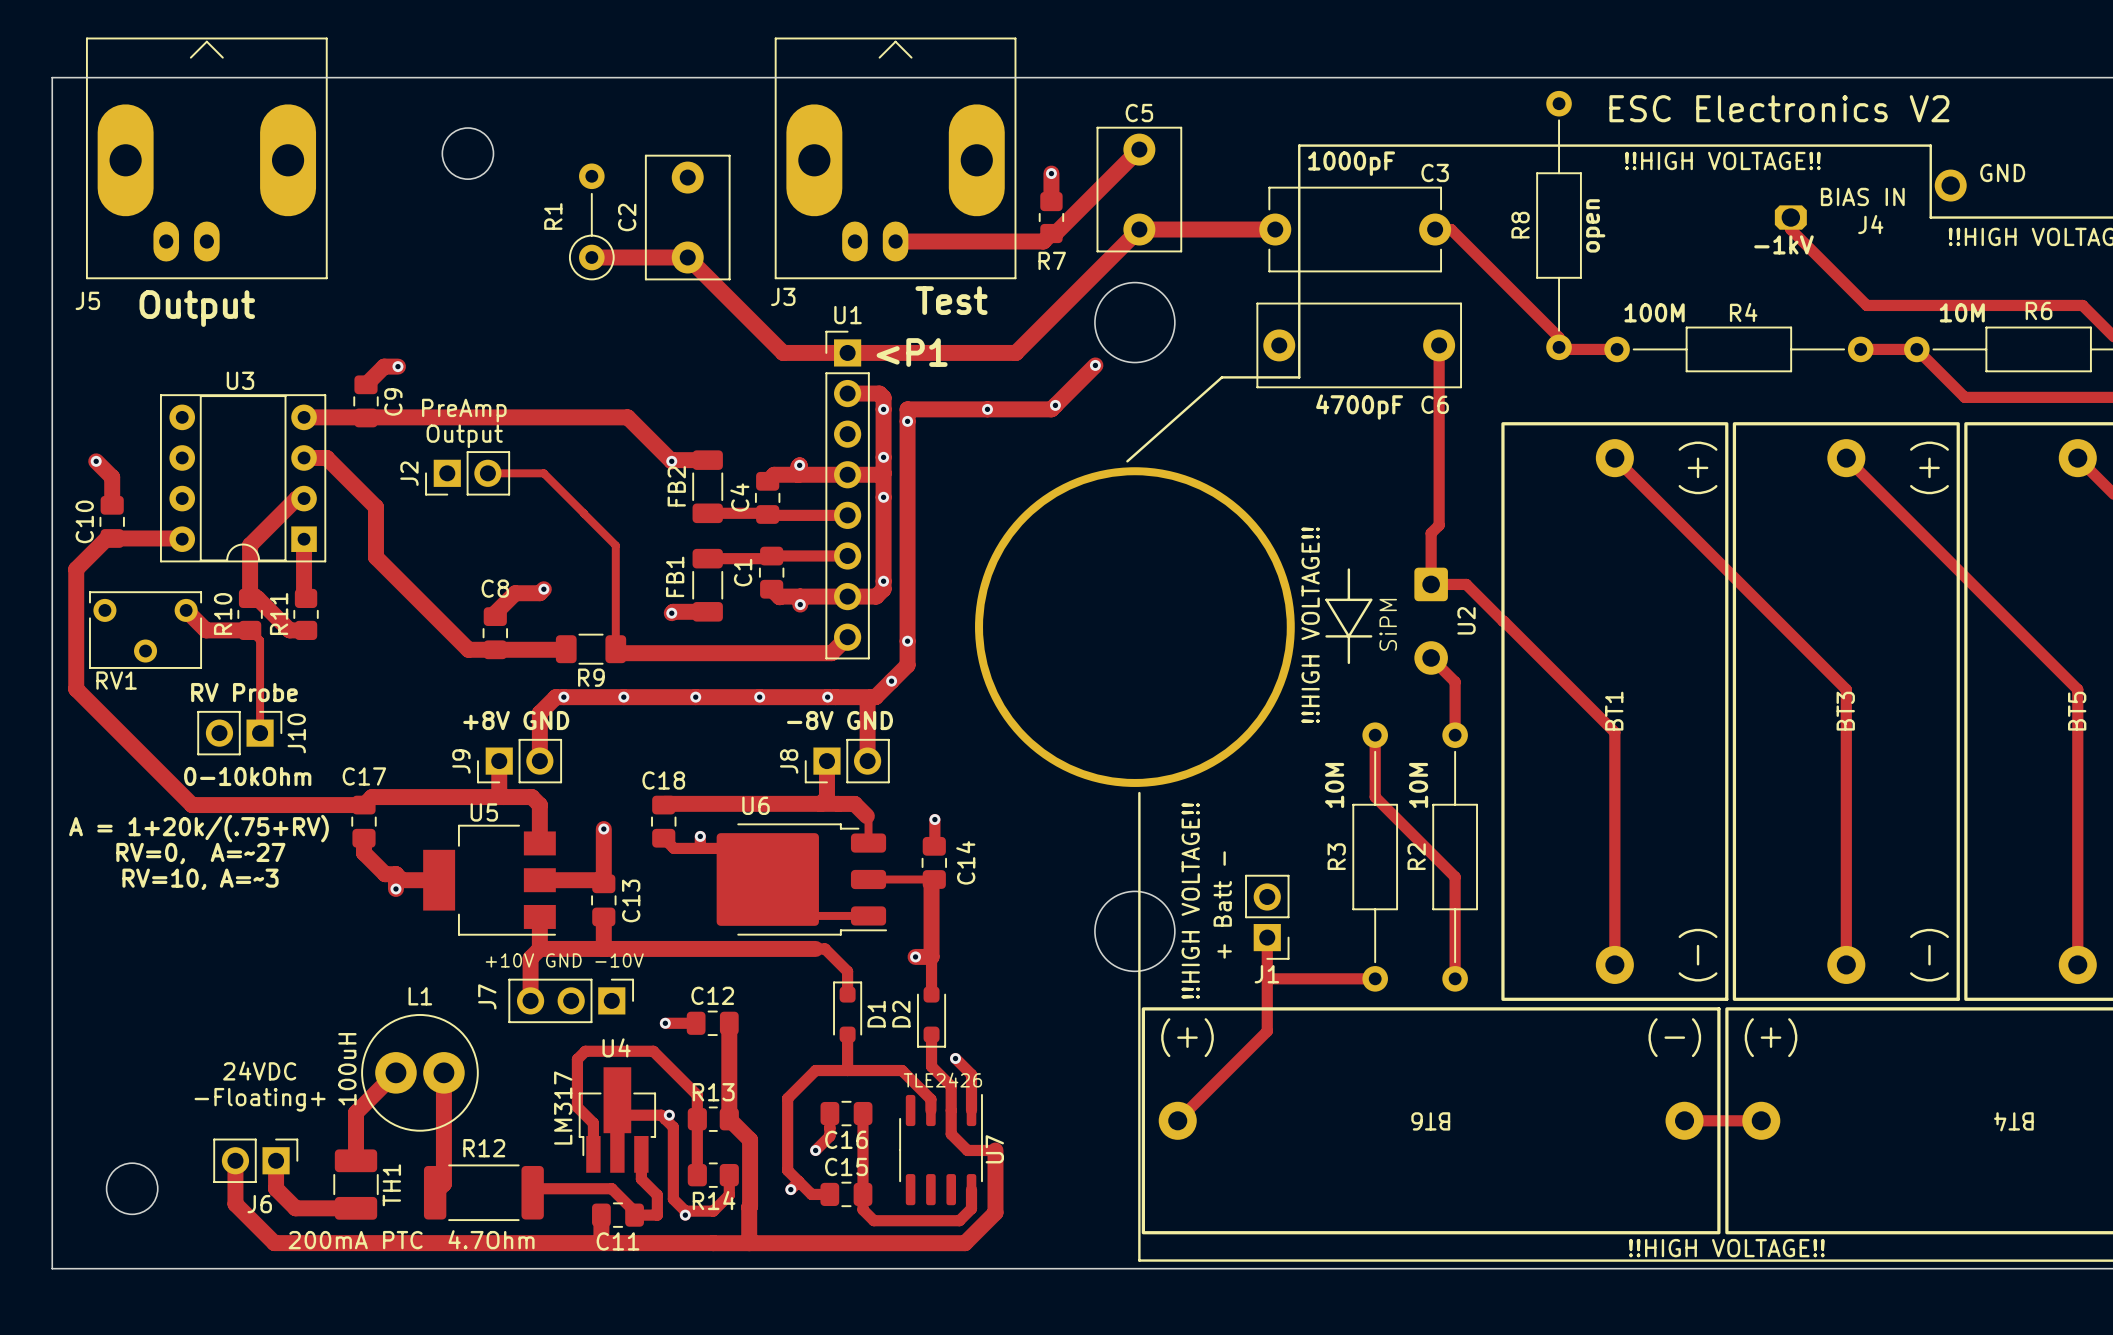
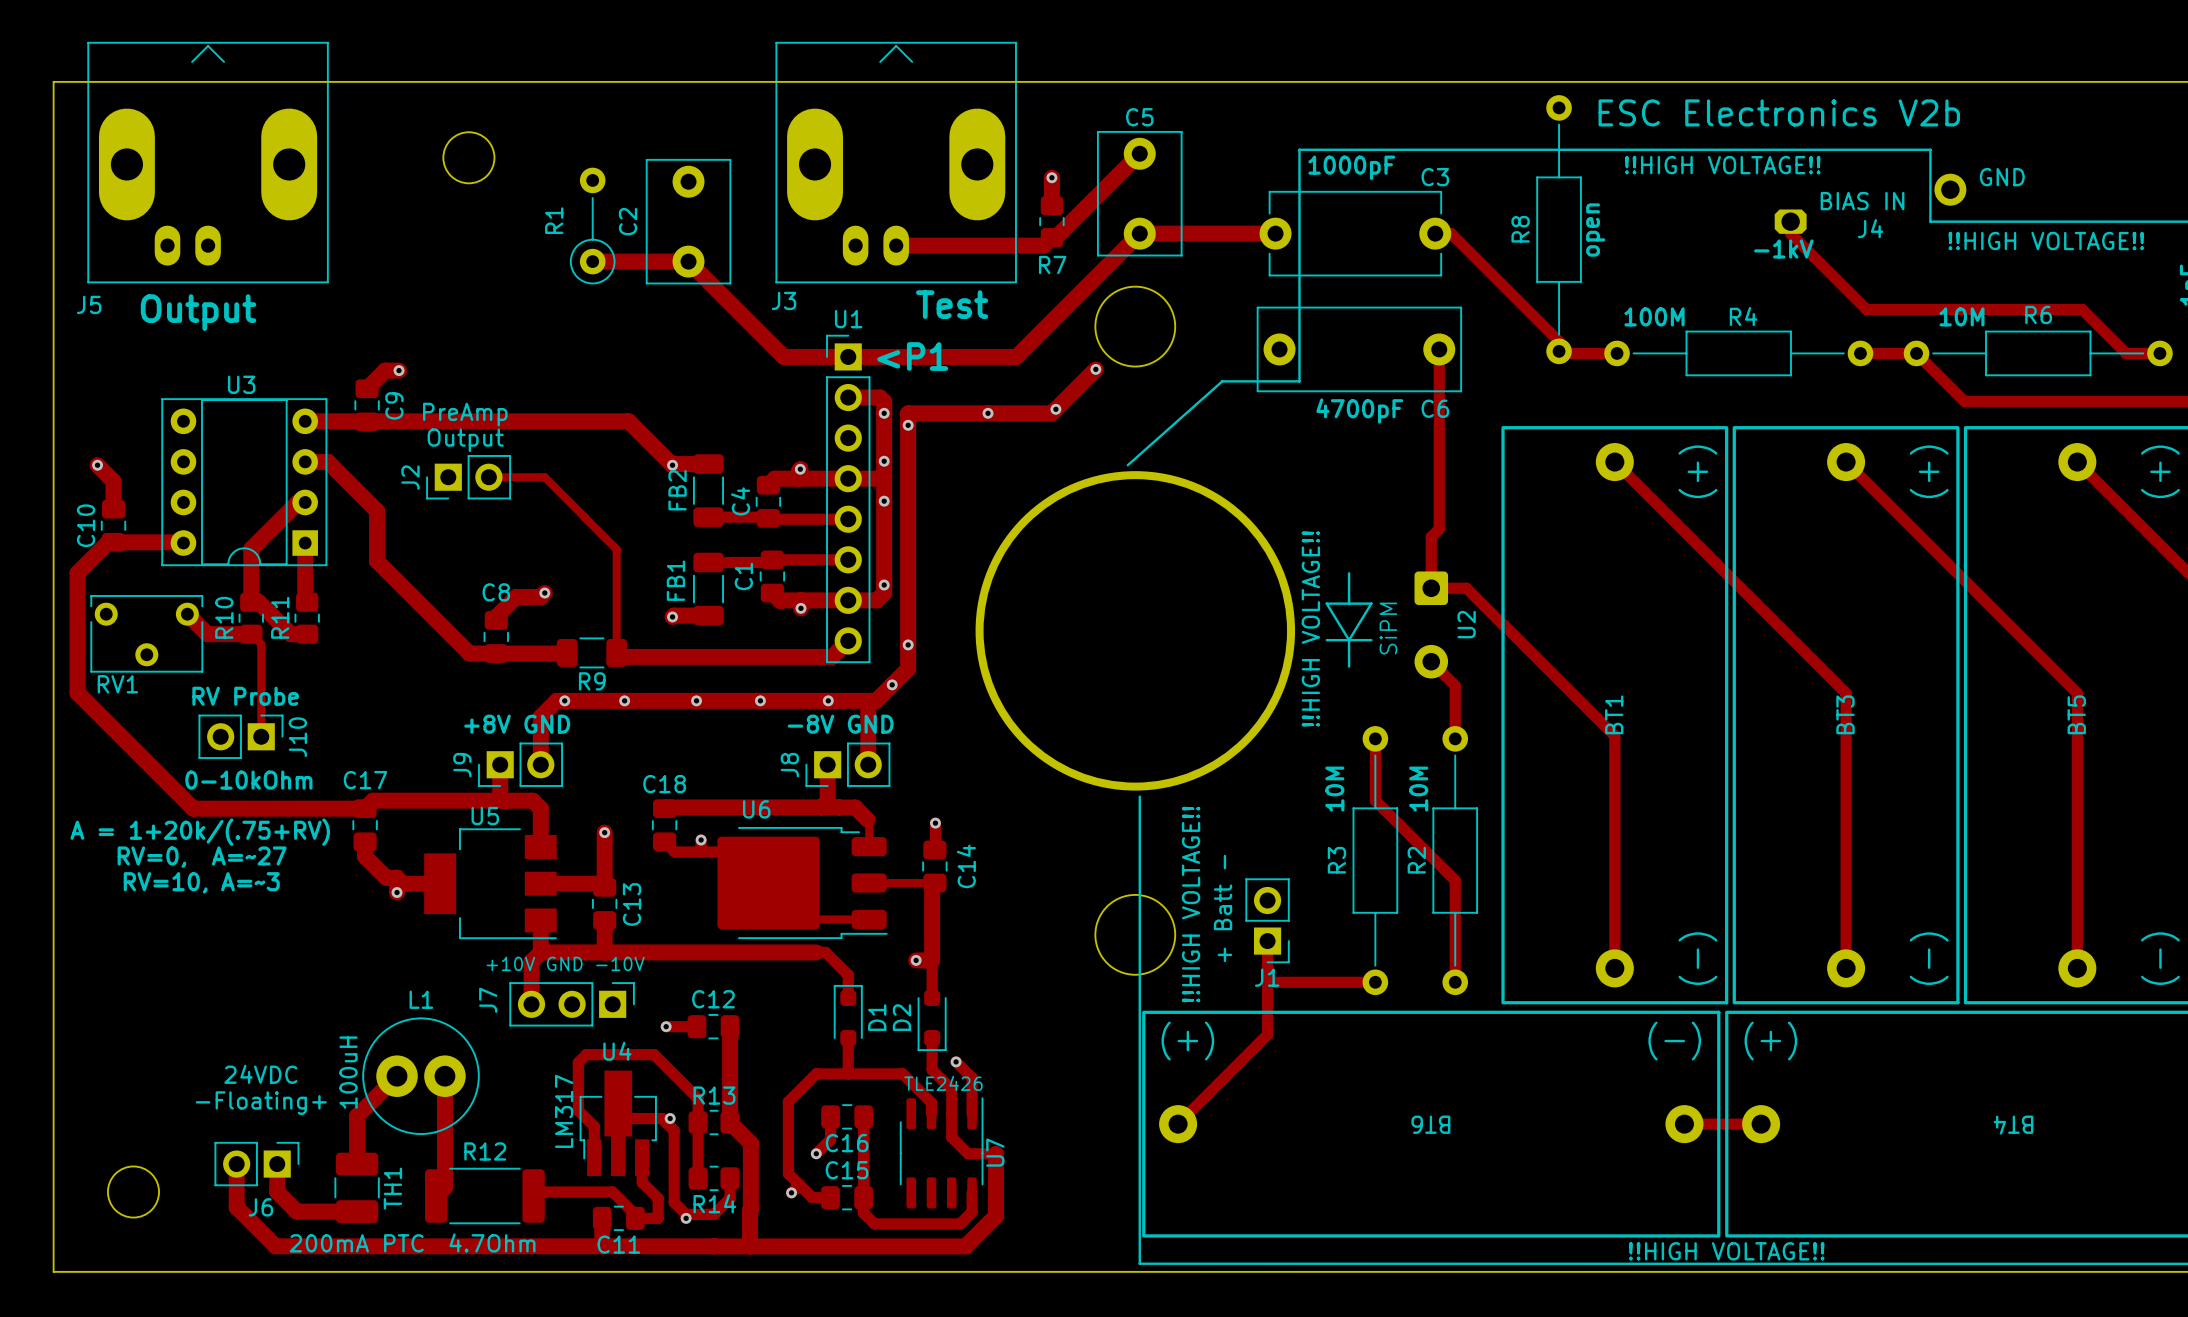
text: ESC Electronics V2 (1779, 108) -> ESC Electronics V2b (1779, 112)

